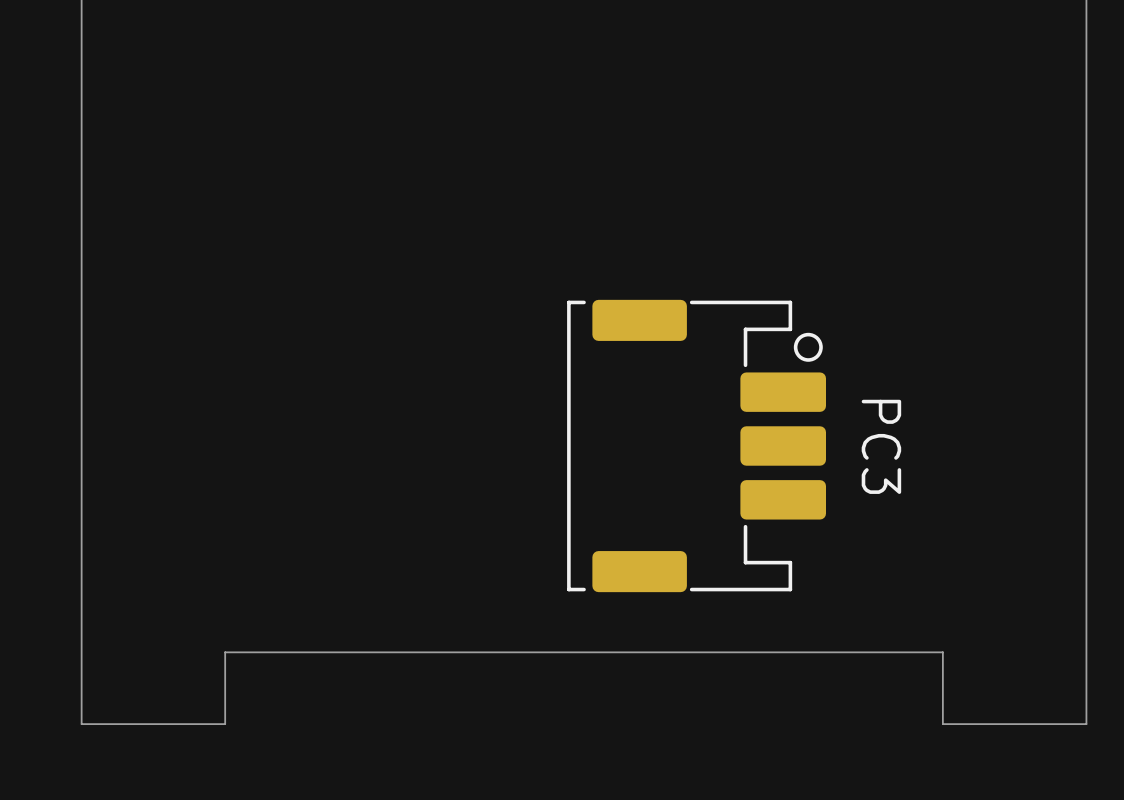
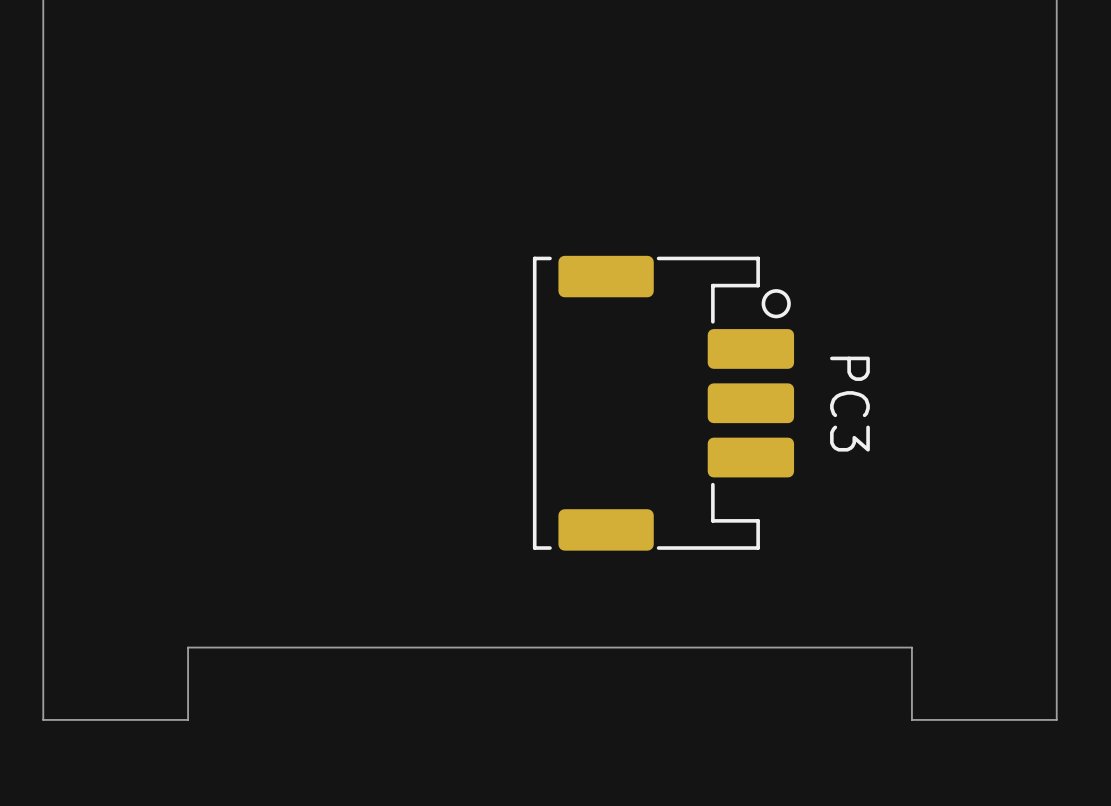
PC3 position: (696, 445) -> (663, 403)

